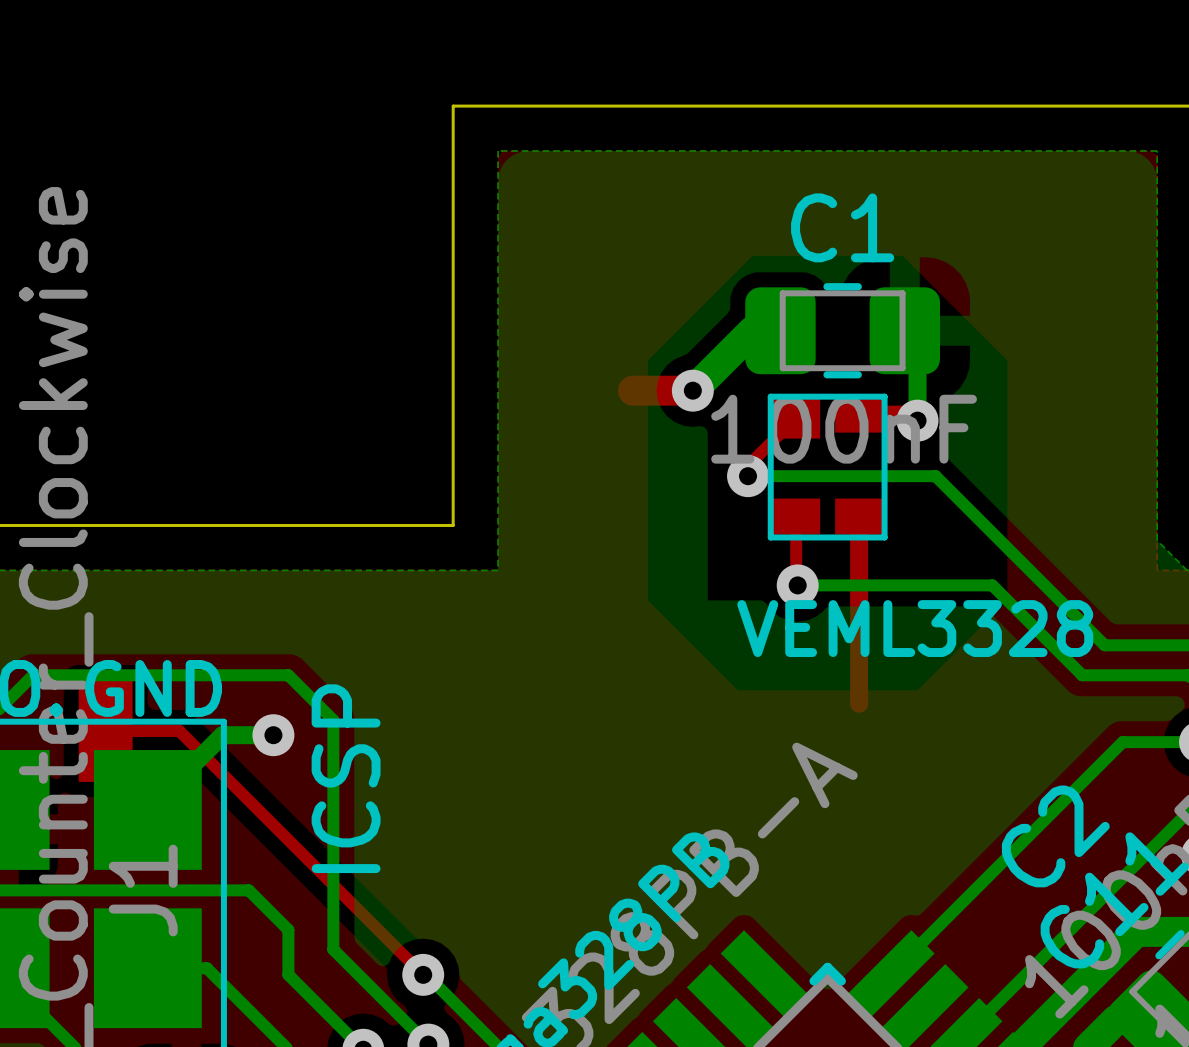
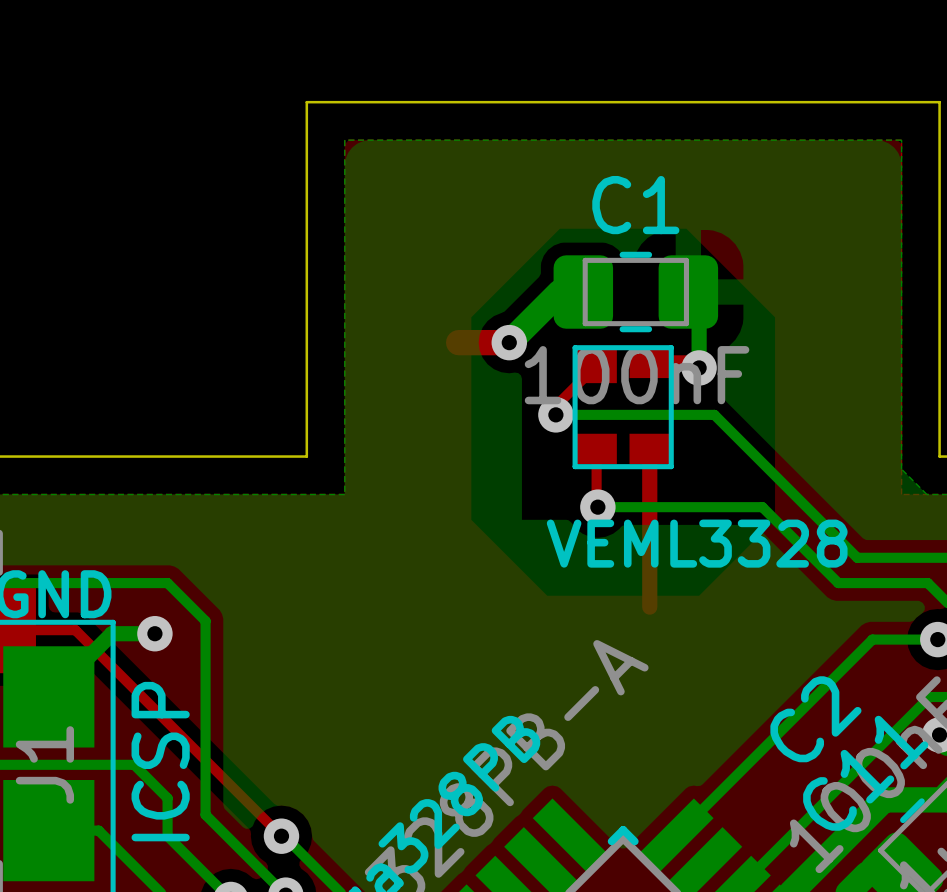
text position: ICSP (346, 778) -> ICSP (160, 761)

